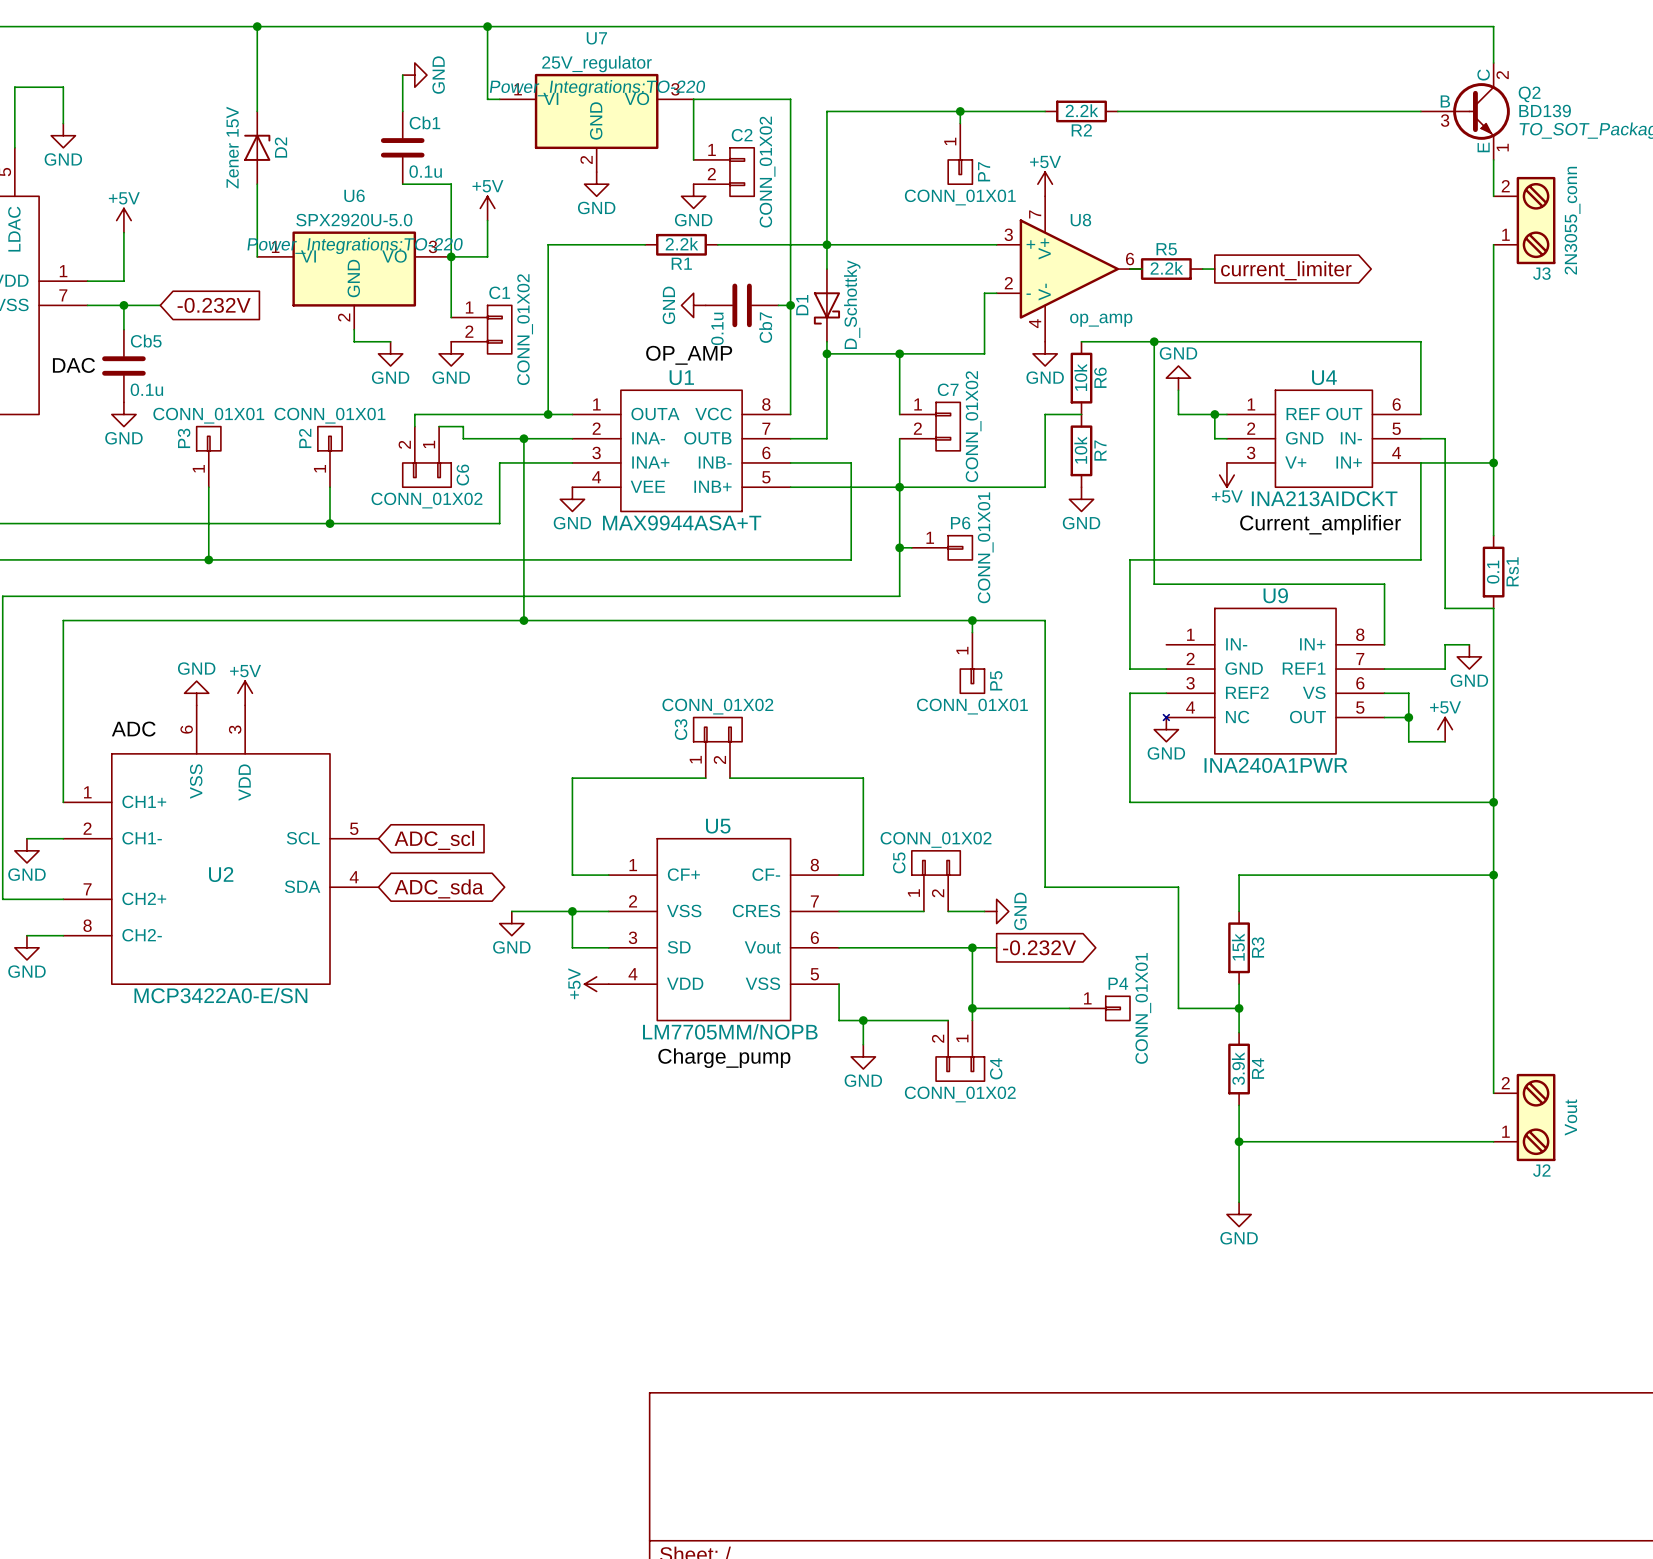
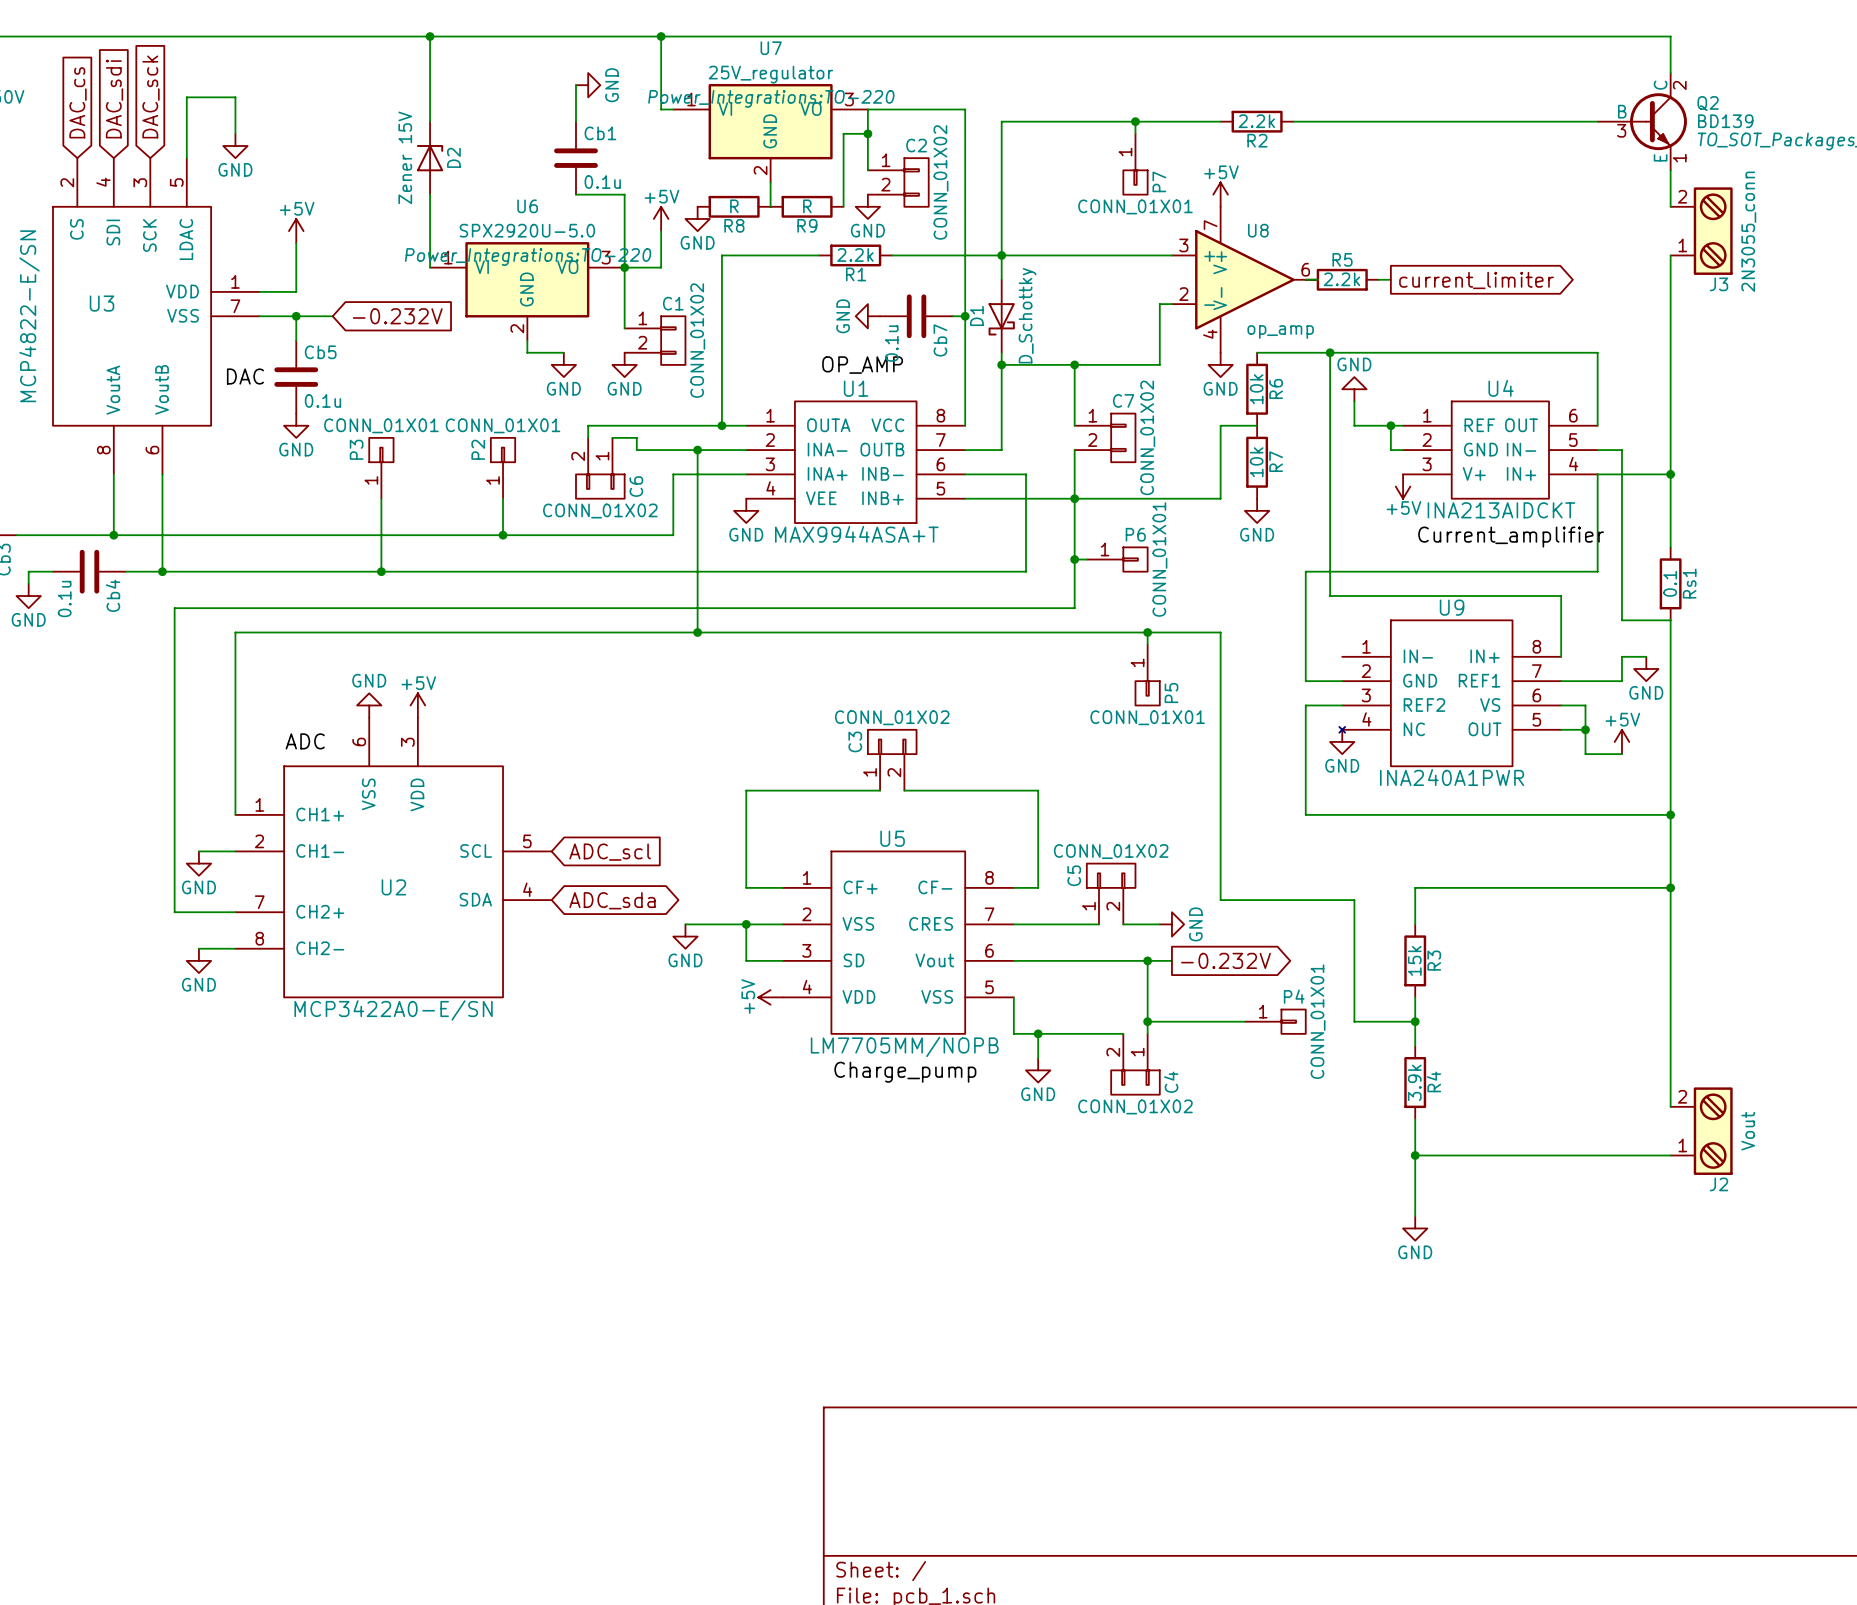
wire: none -> (867, 133) (843, 133) (843, 206)
junction: none -> (867, 133)
power symbol position: GND (596, 184) -> GND (697, 218)
R8: none -> R (734, 206)
R9: none -> R (807, 206)

